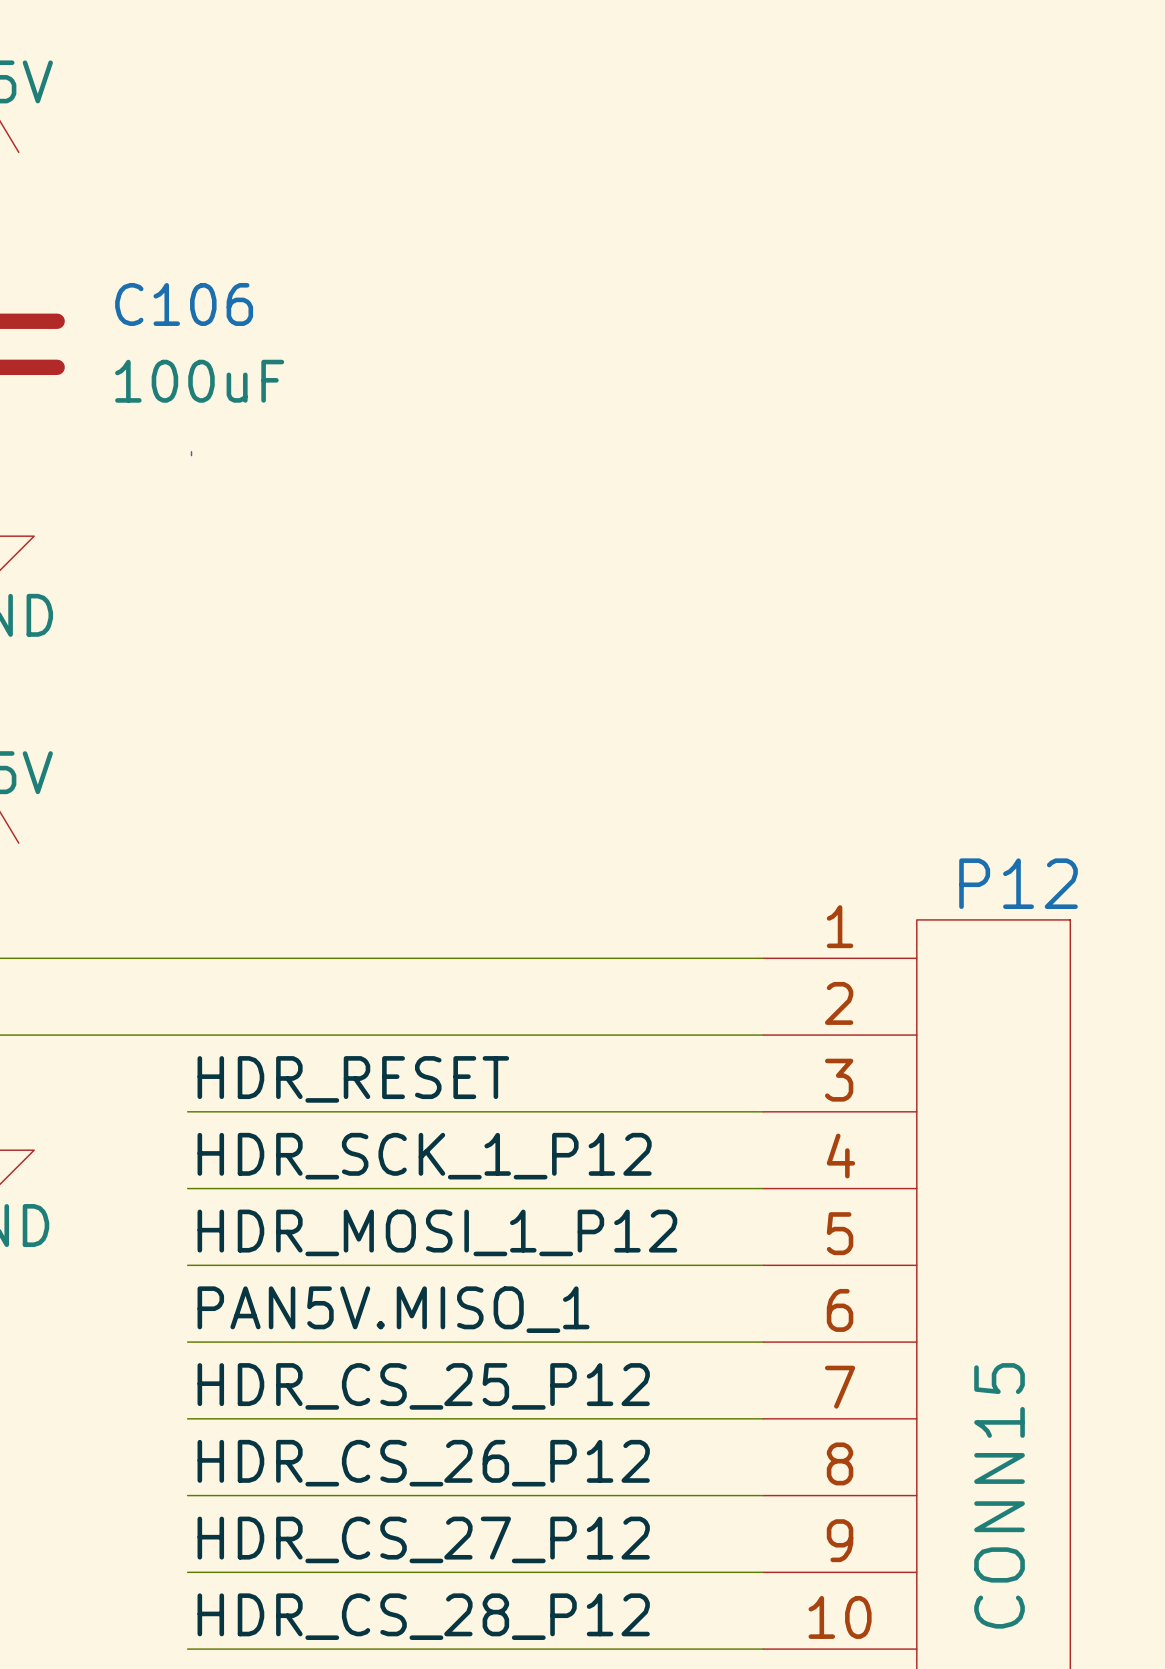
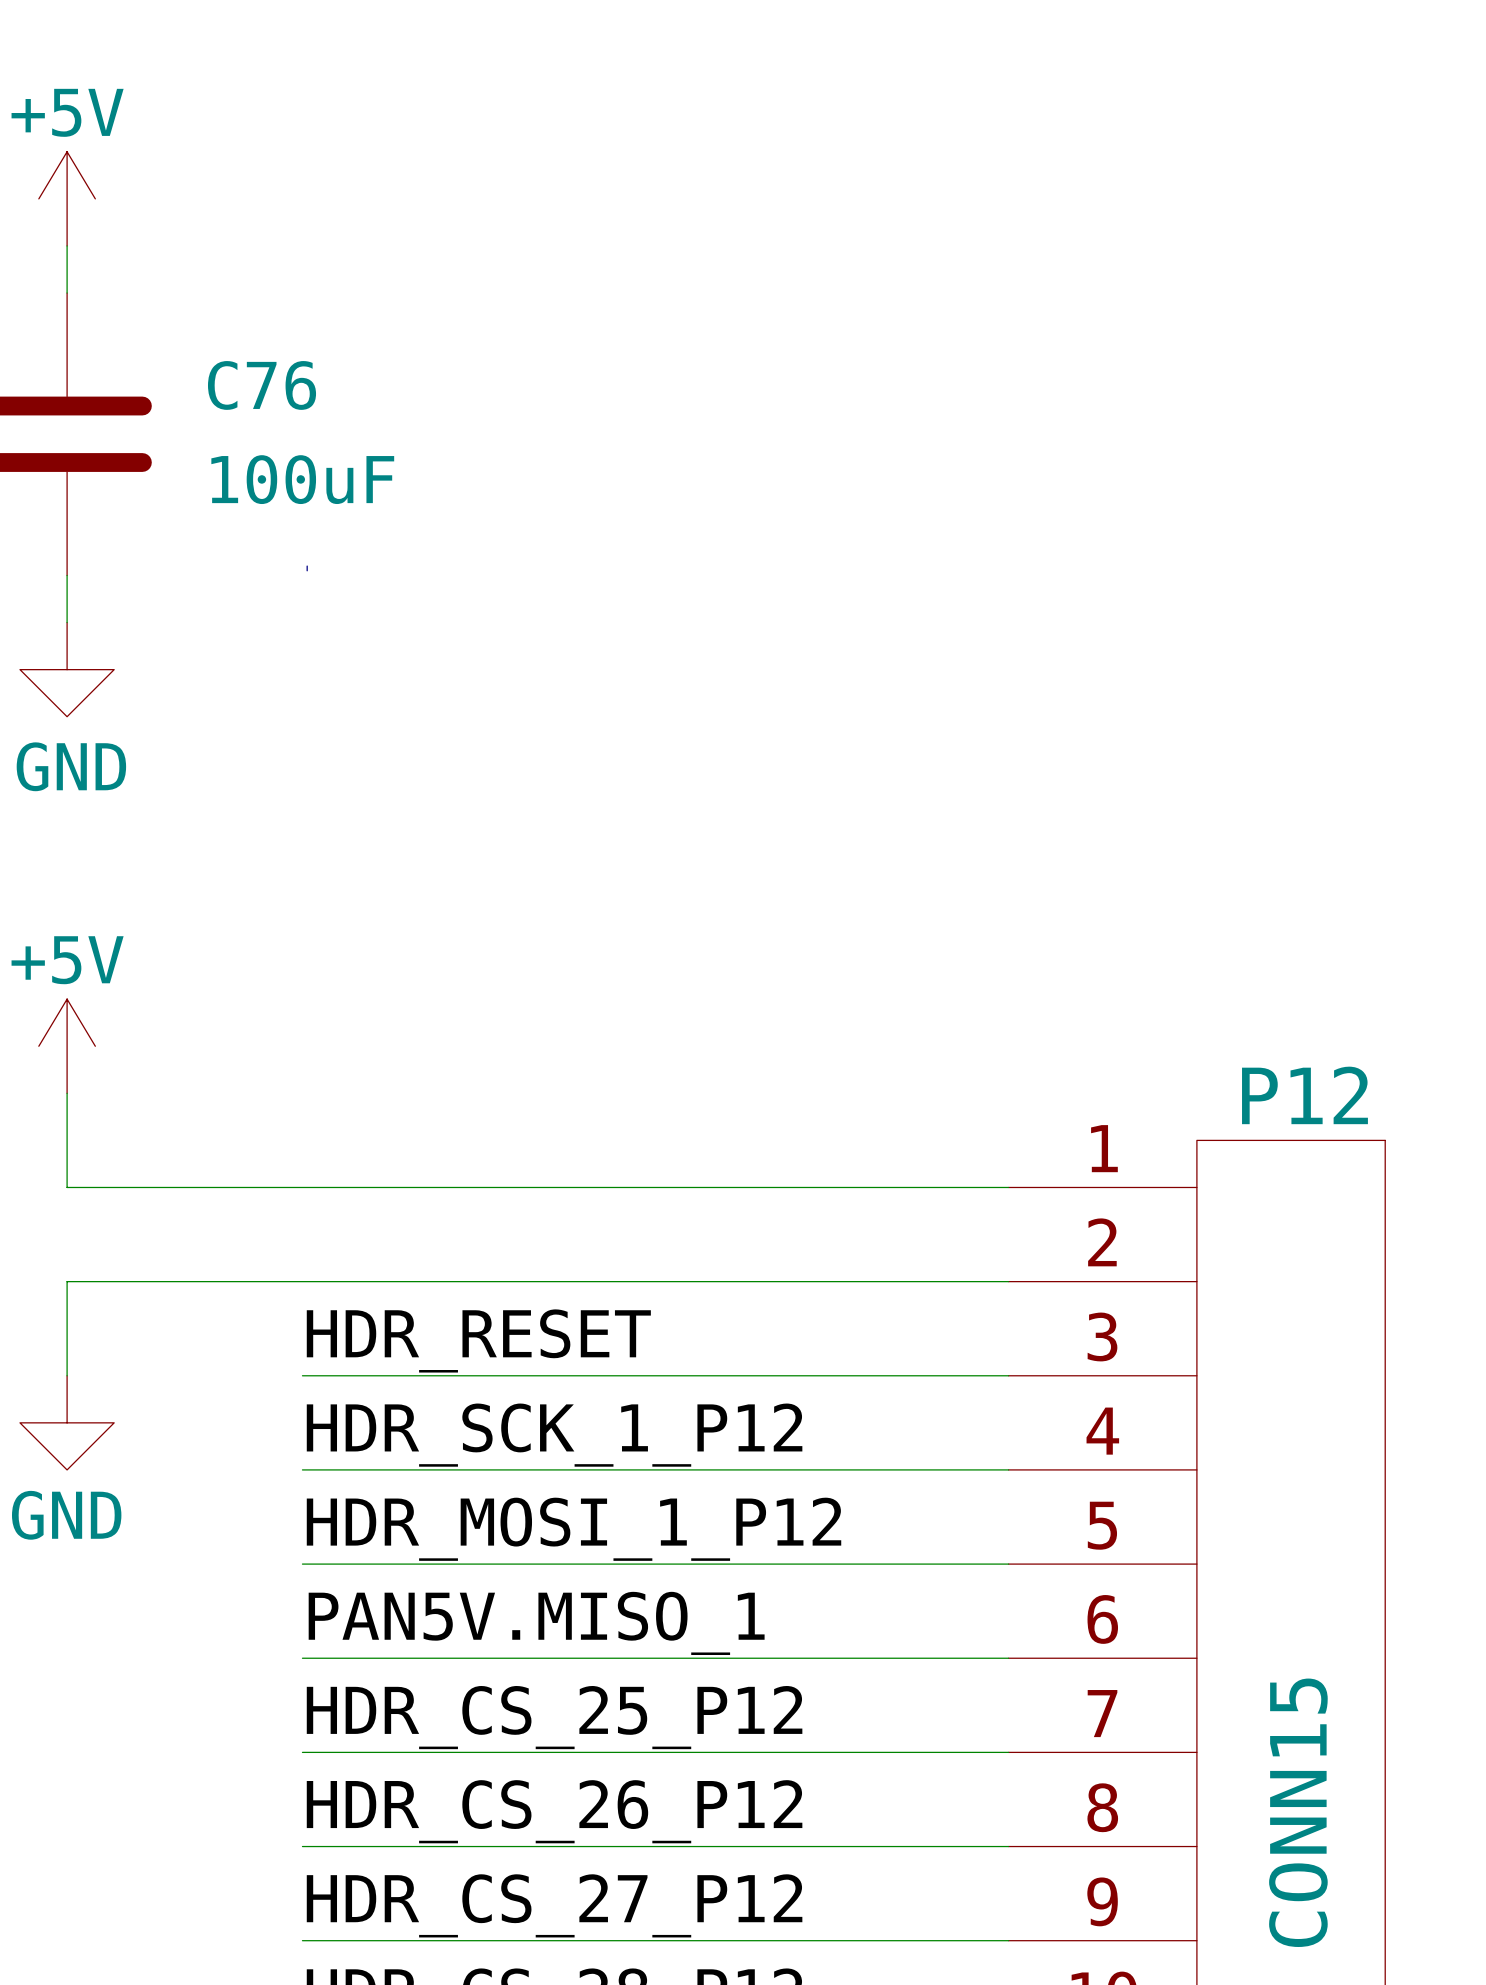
C106 name: C106 (184, 304) -> C76 (262, 385)

